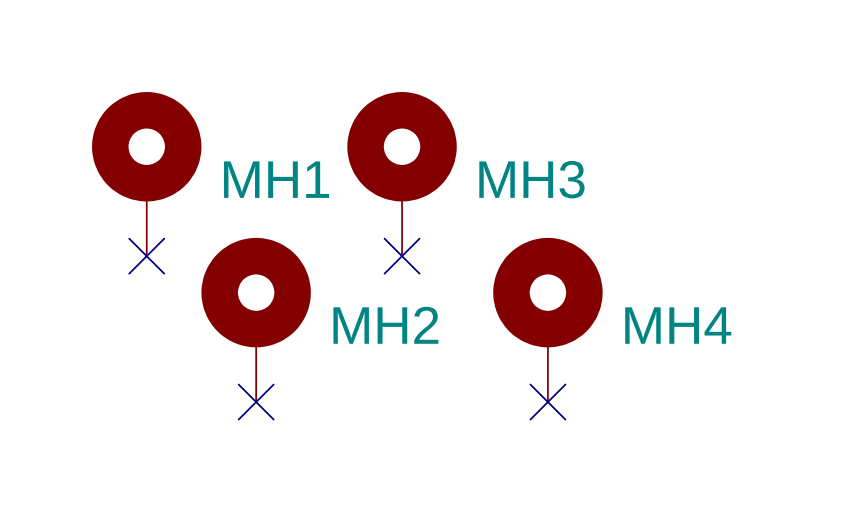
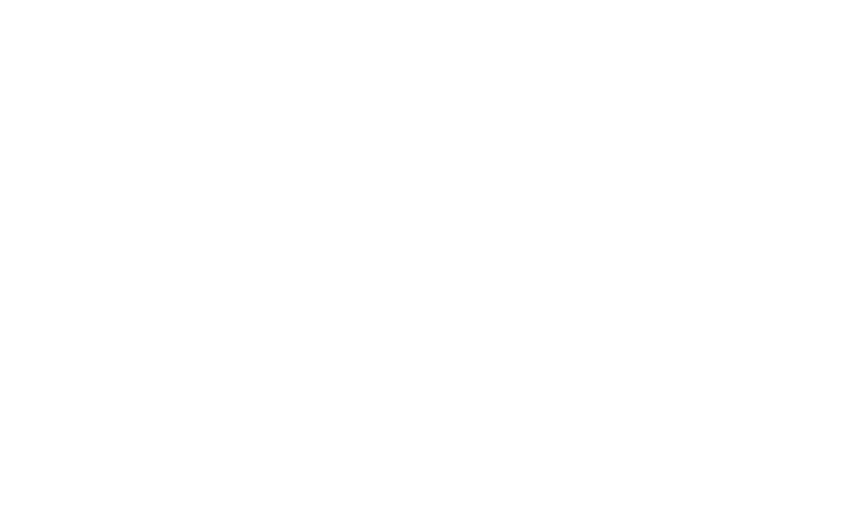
MH1: (146, 174) -> none
MH3: (402, 174) -> none
no-connect mark: (146, 256) -> none
no-connect mark: (402, 256) -> none
MH2: (256, 319) -> none
MH4: (547, 319) -> none
no-connect mark: (256, 402) -> none
no-connect mark: (547, 402) -> none

